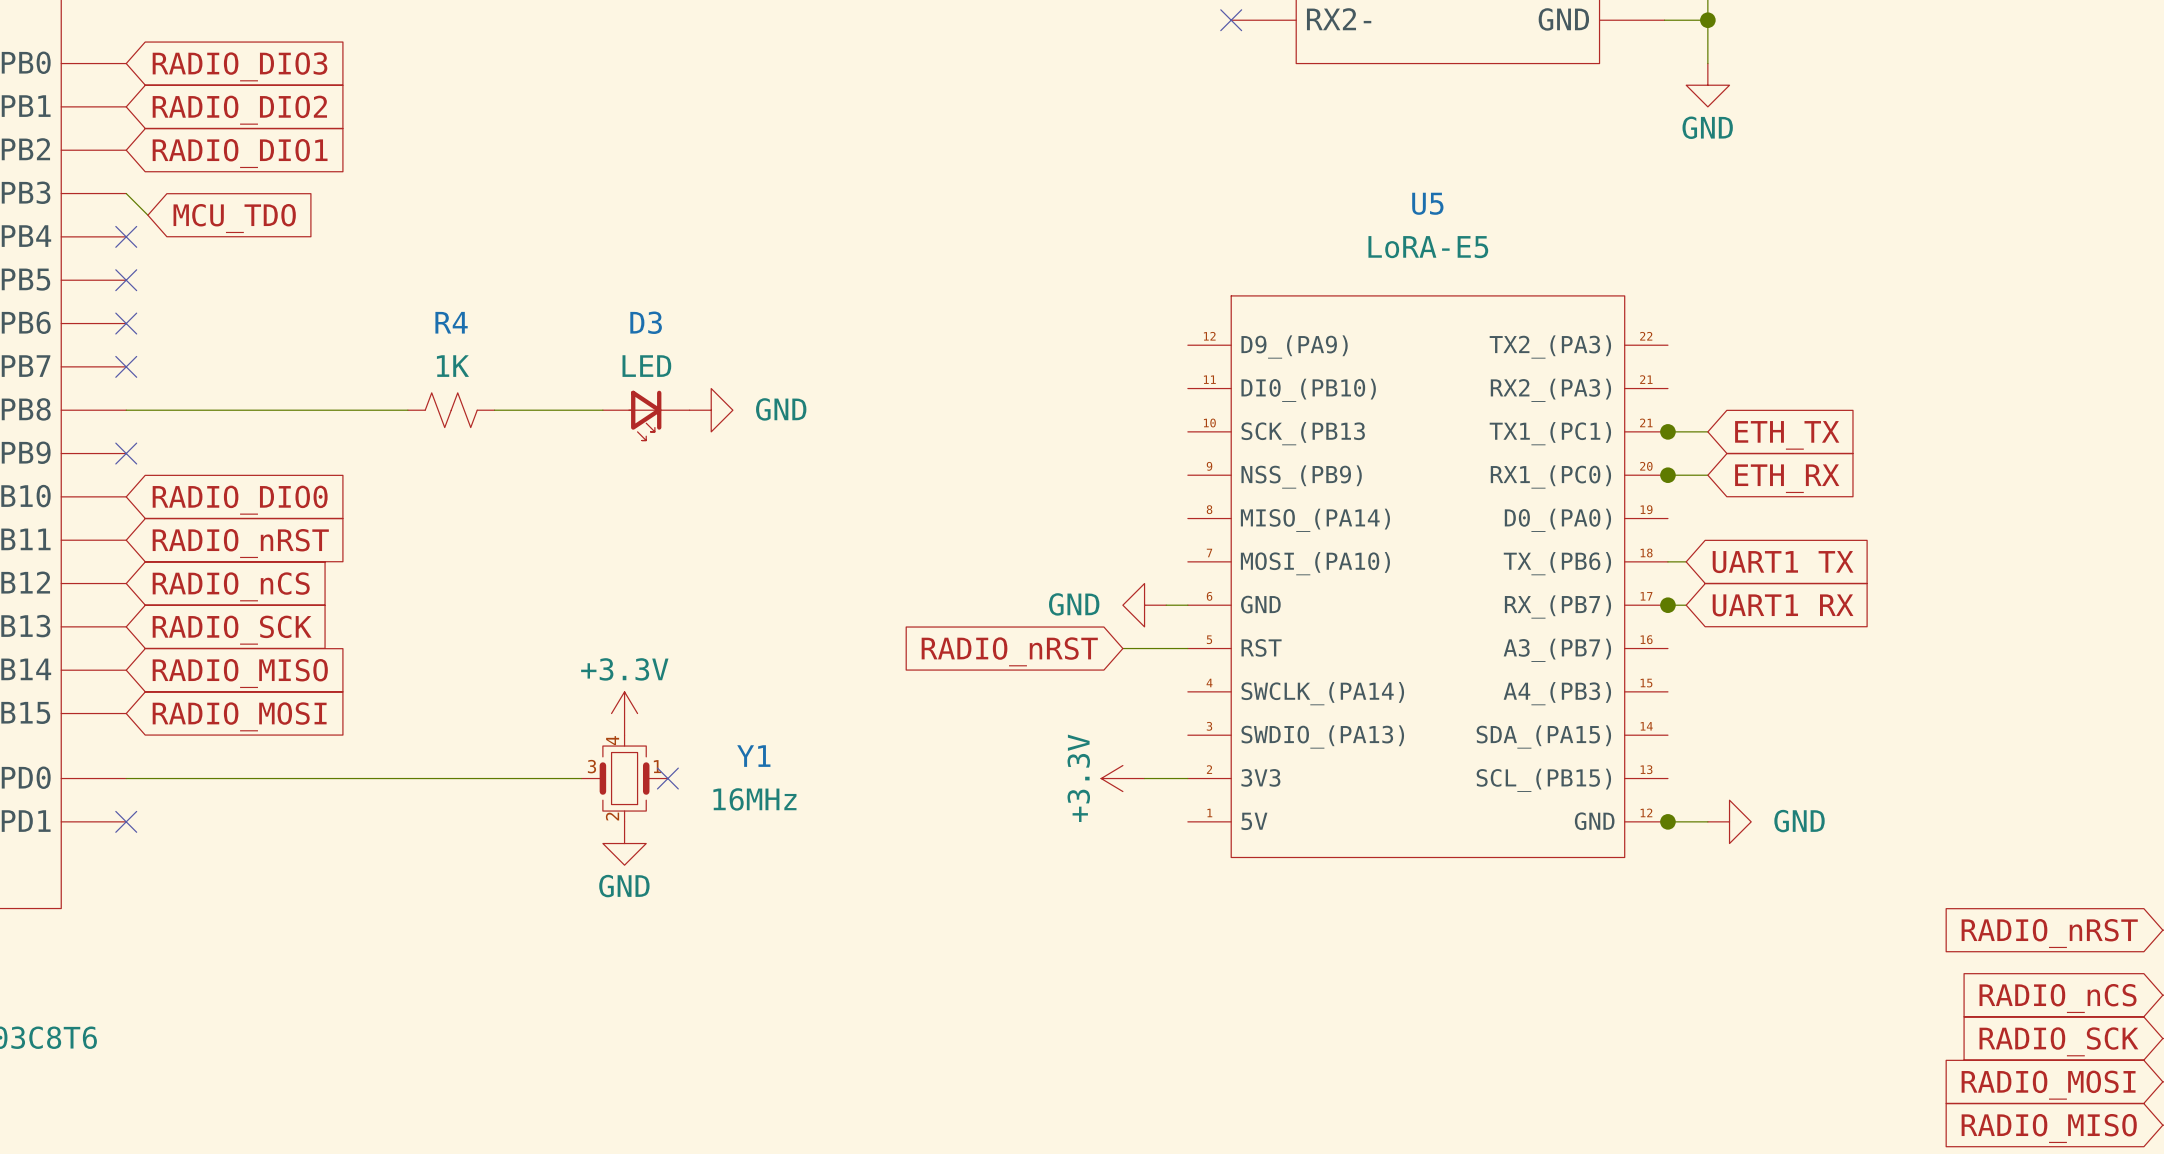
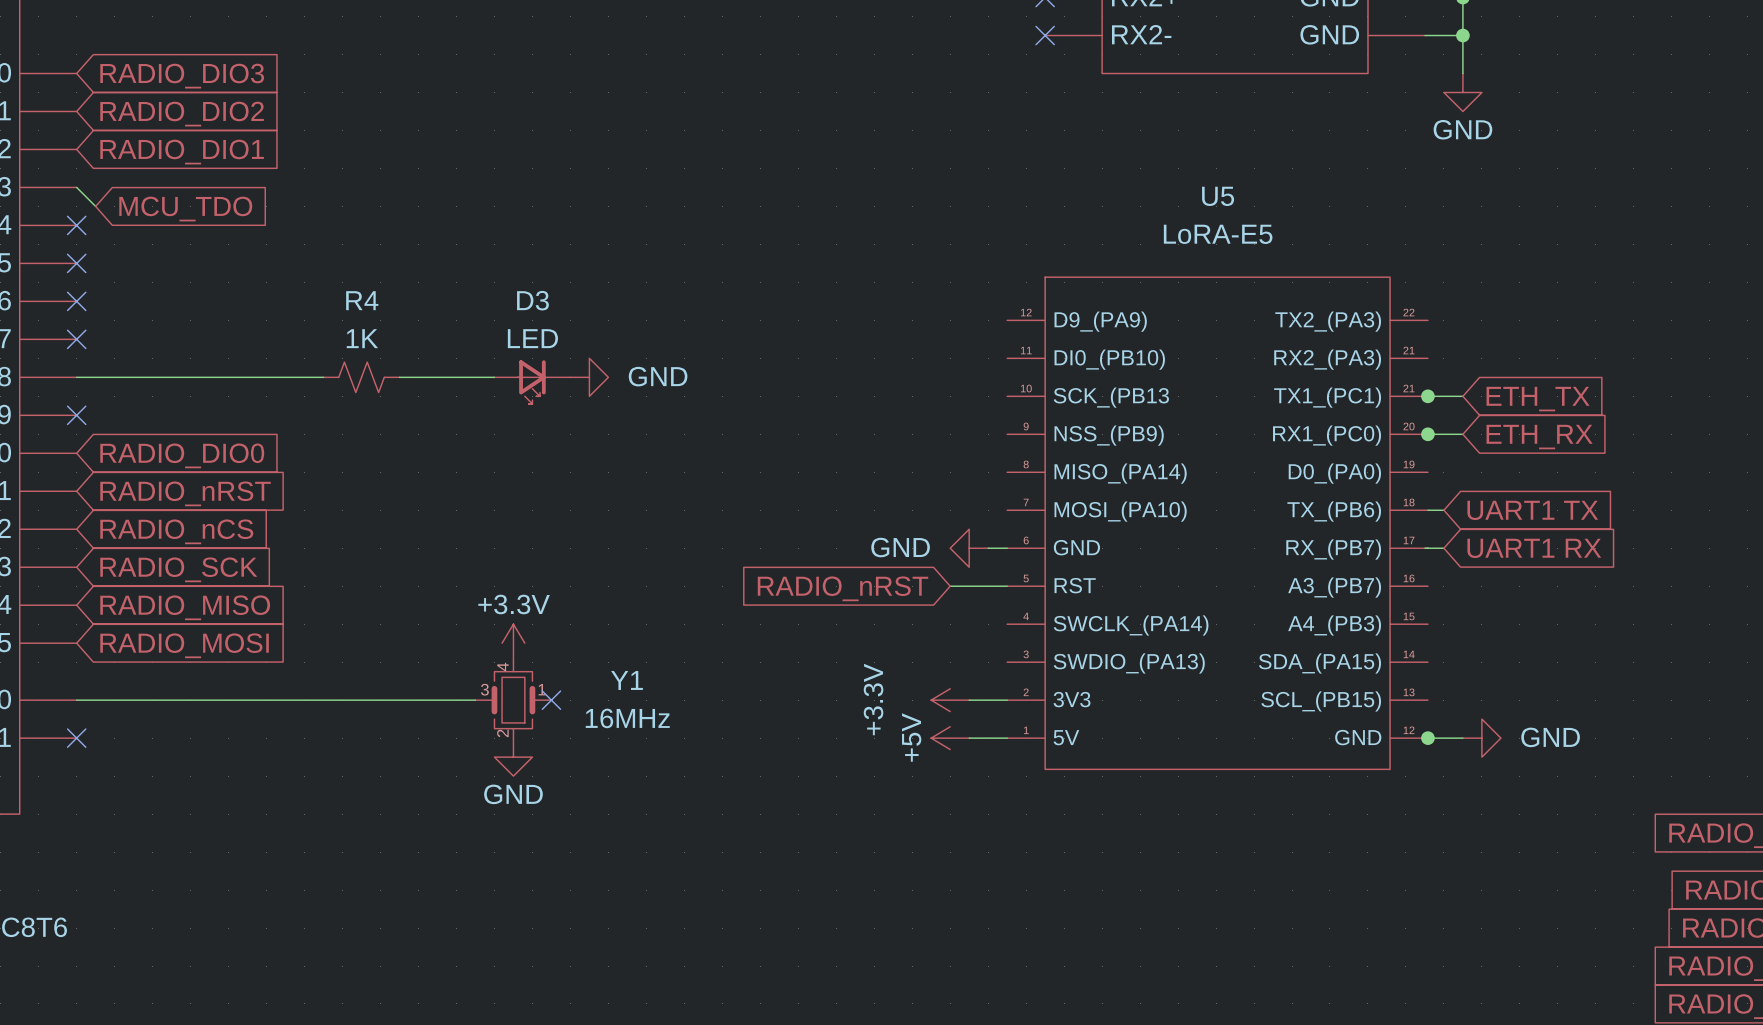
junction: (1667, 605) -> none
power symbol text position: +3.3V (1078, 778) -> +3.3V (873, 699)
power symbol: none -> +5V (950, 738)
wire: none -> (969, 738) (1007, 738)

